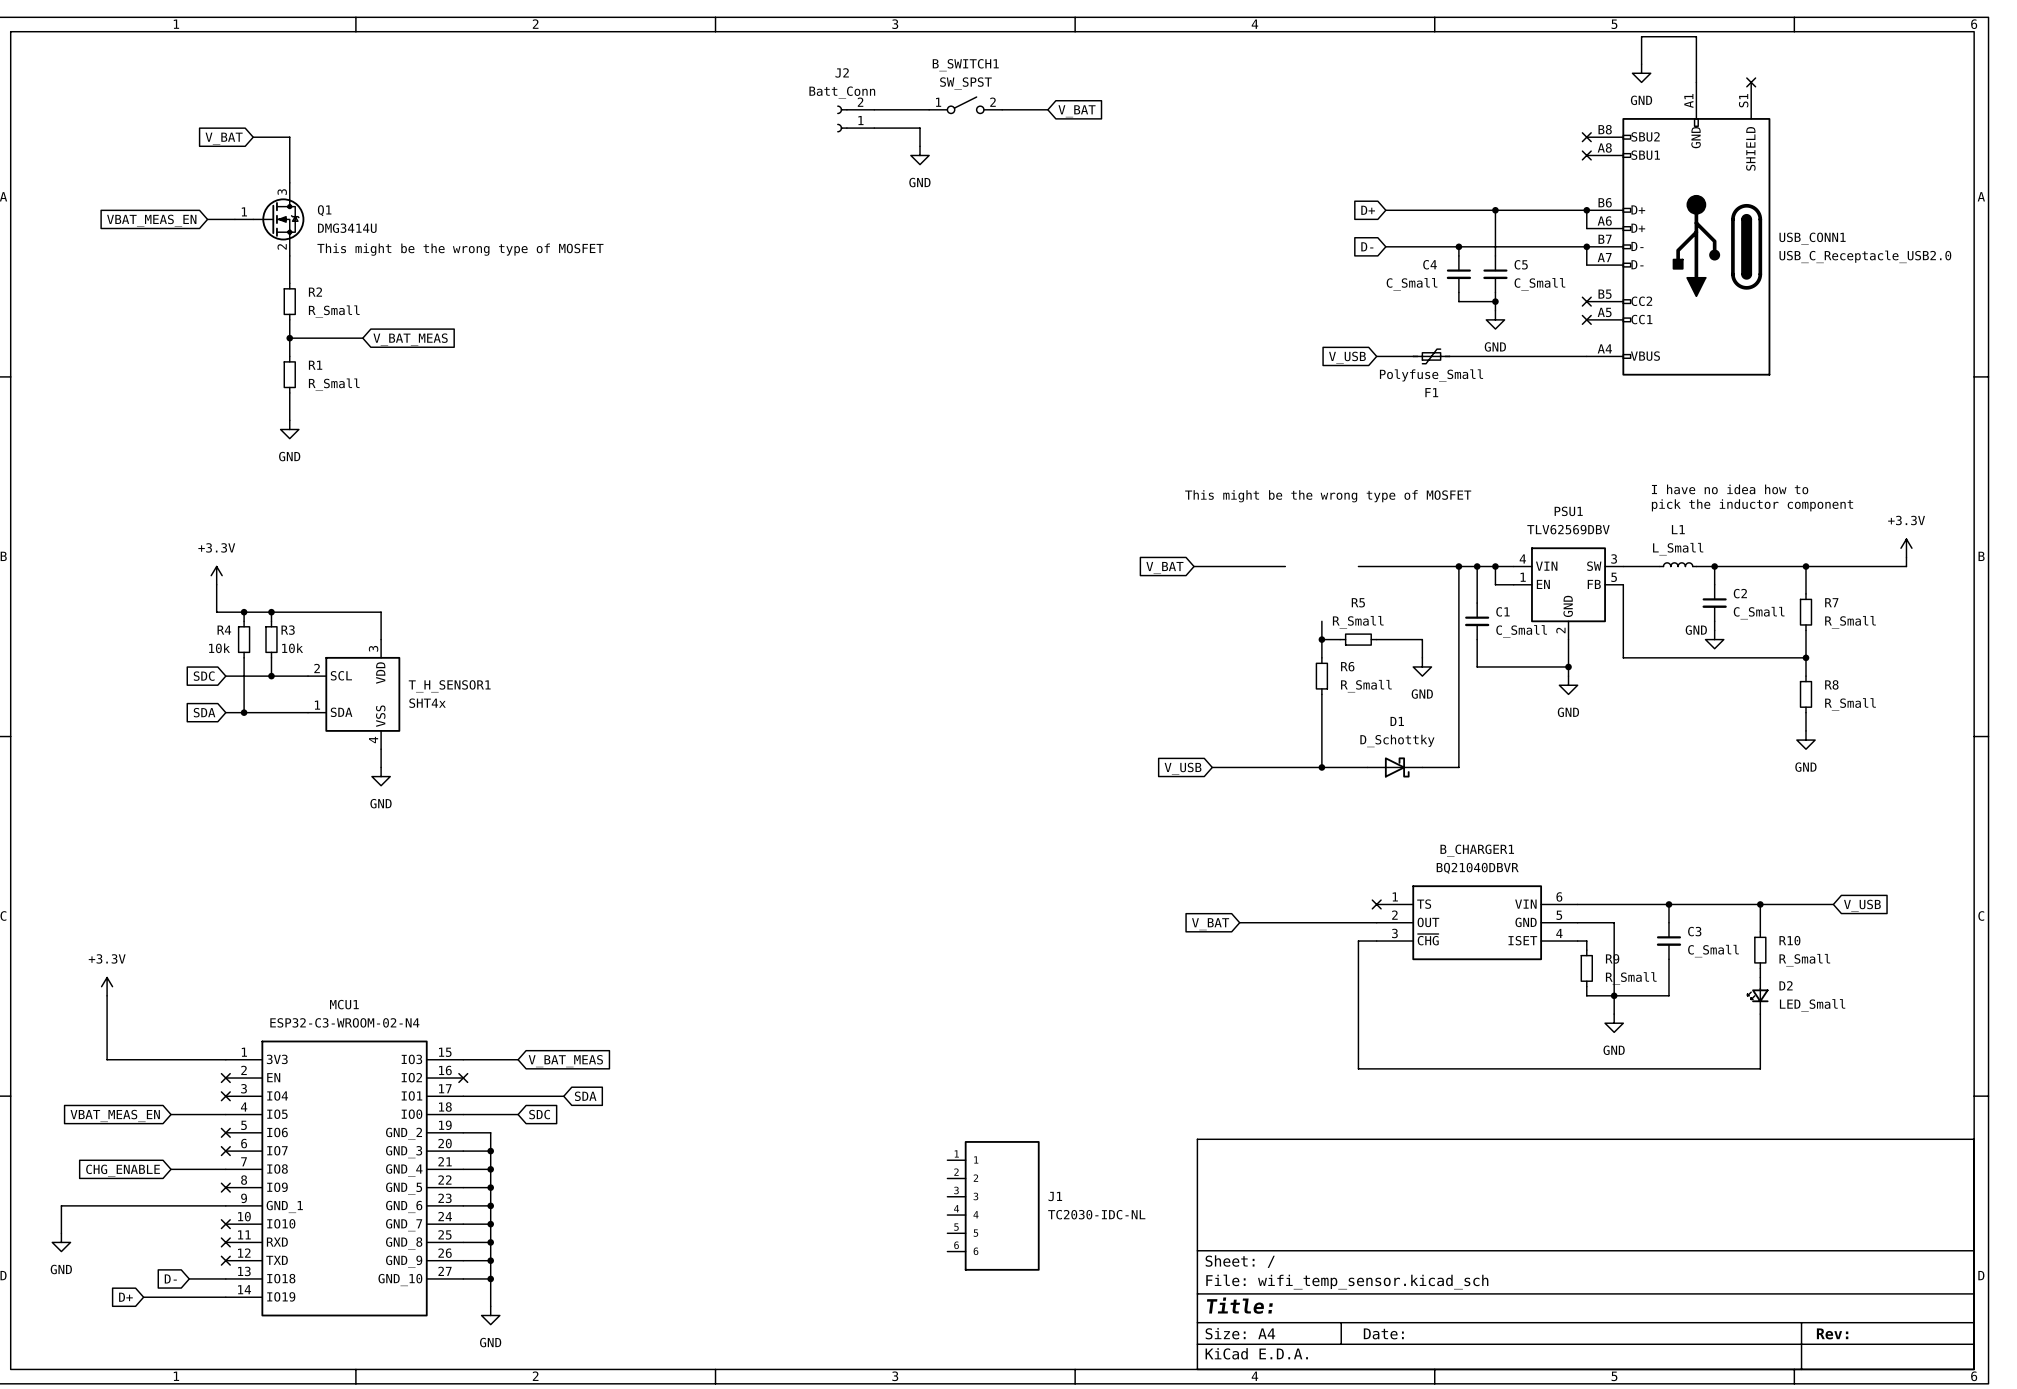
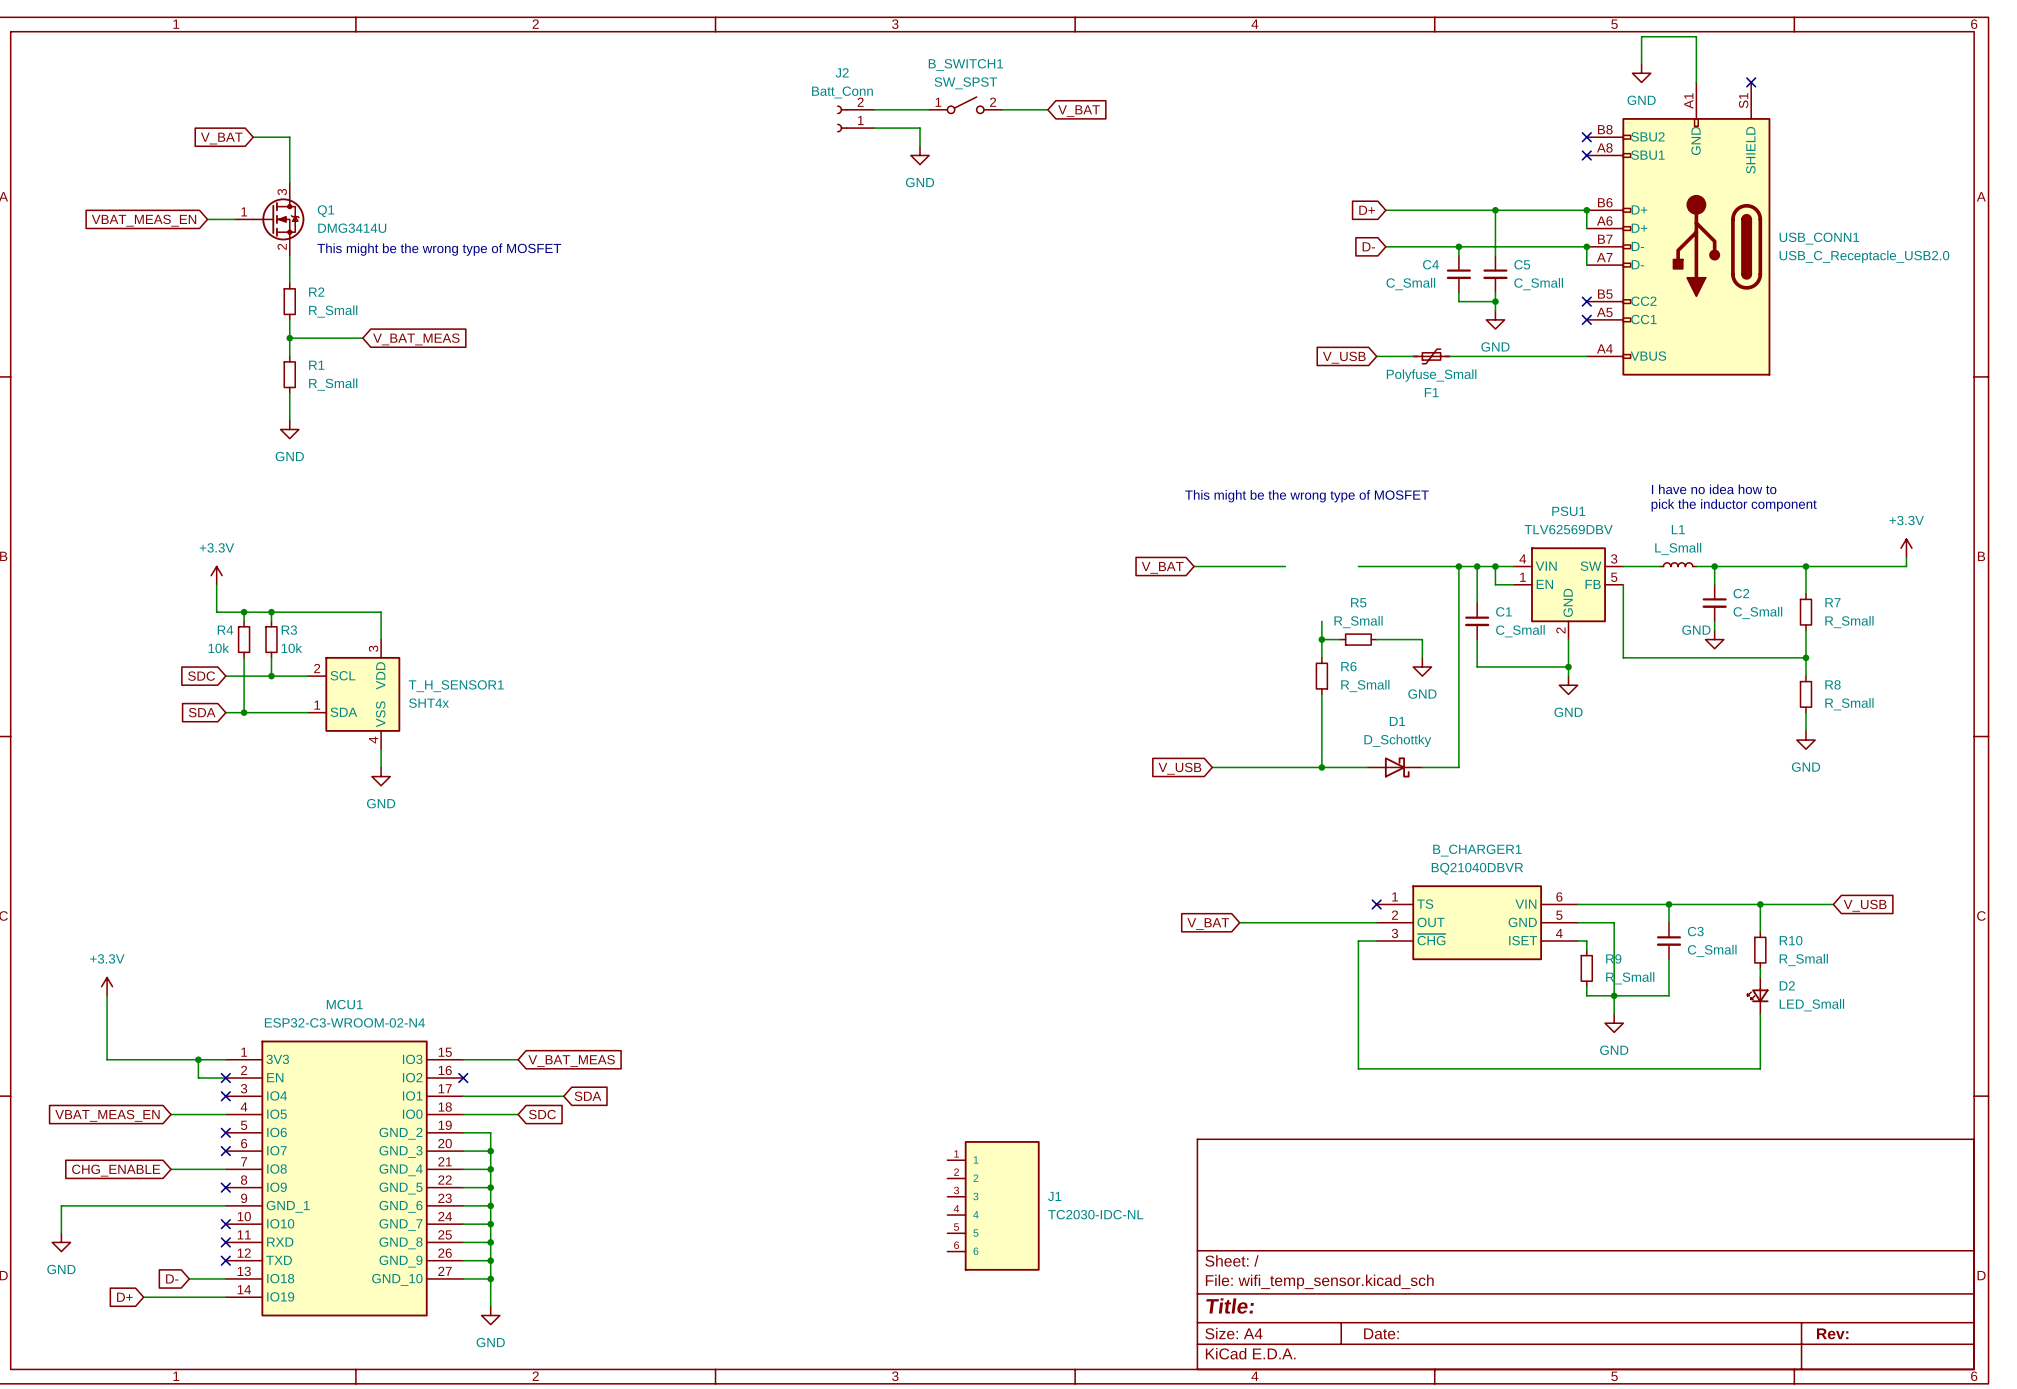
wire: none -> (198, 1059) (198, 1078) (225, 1078)
junction: none -> (198, 1059)

